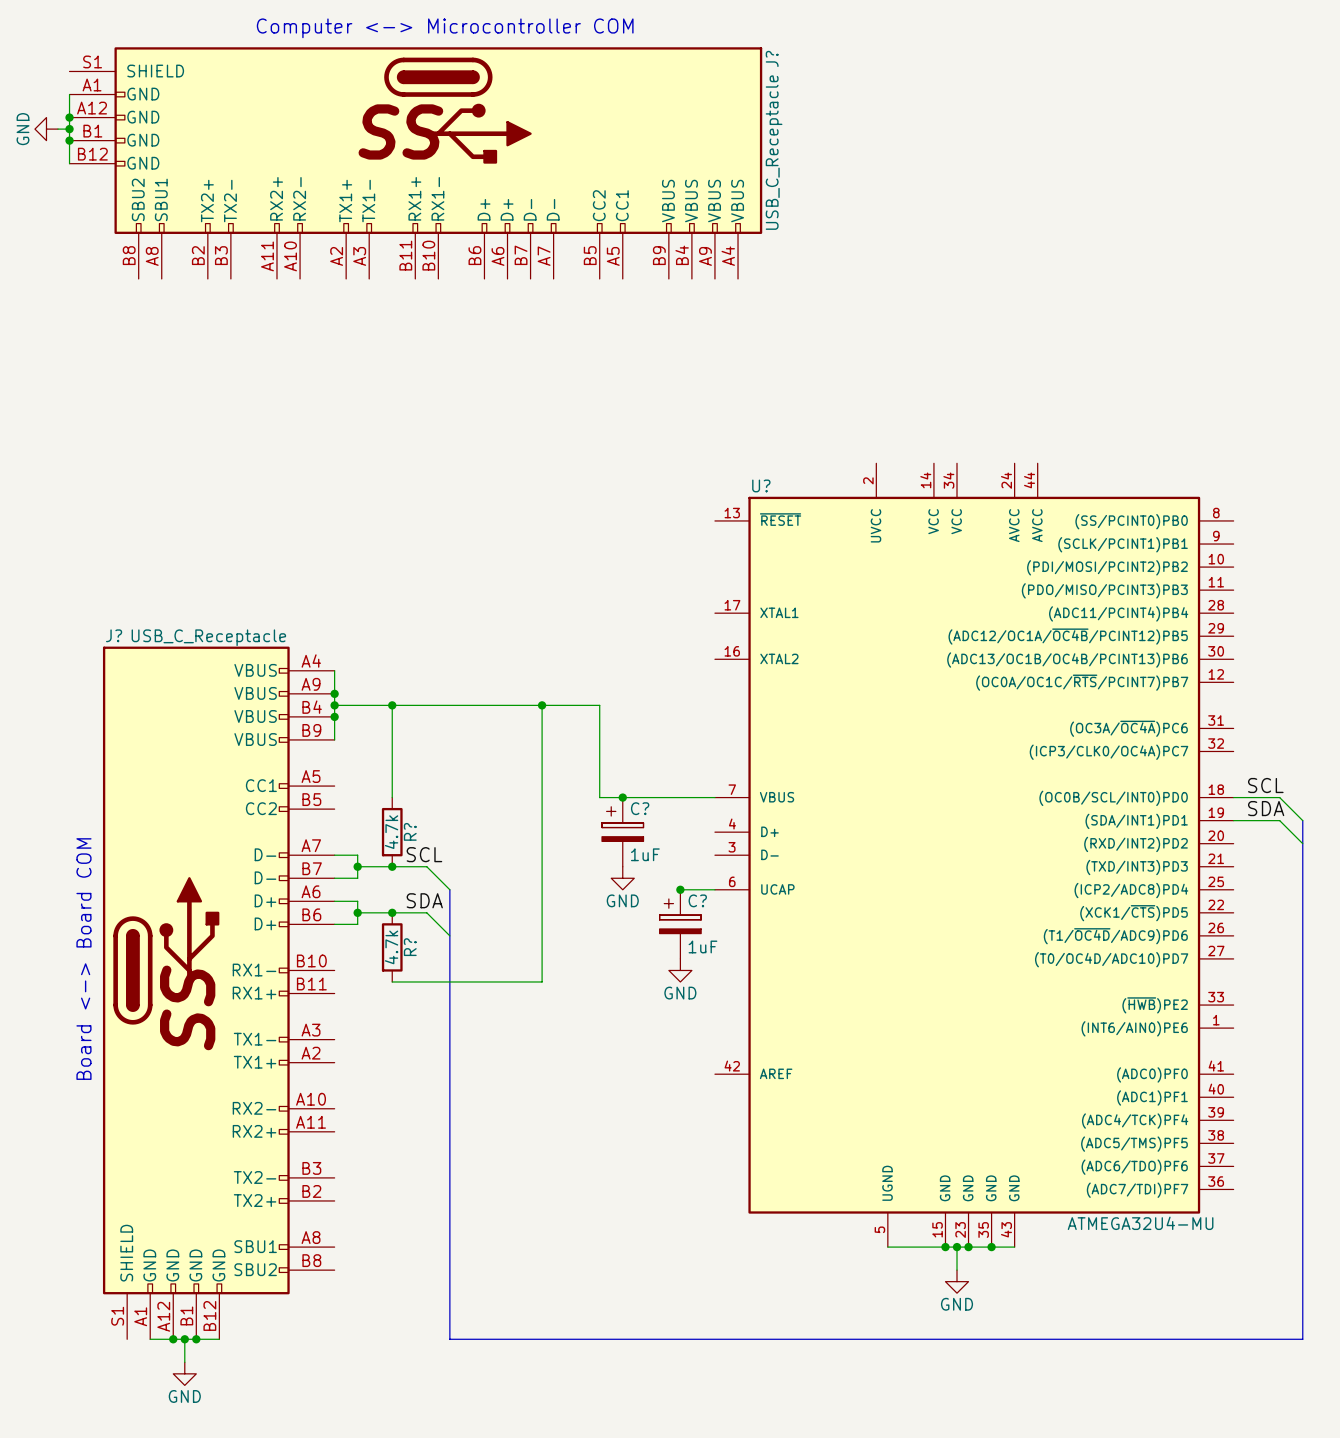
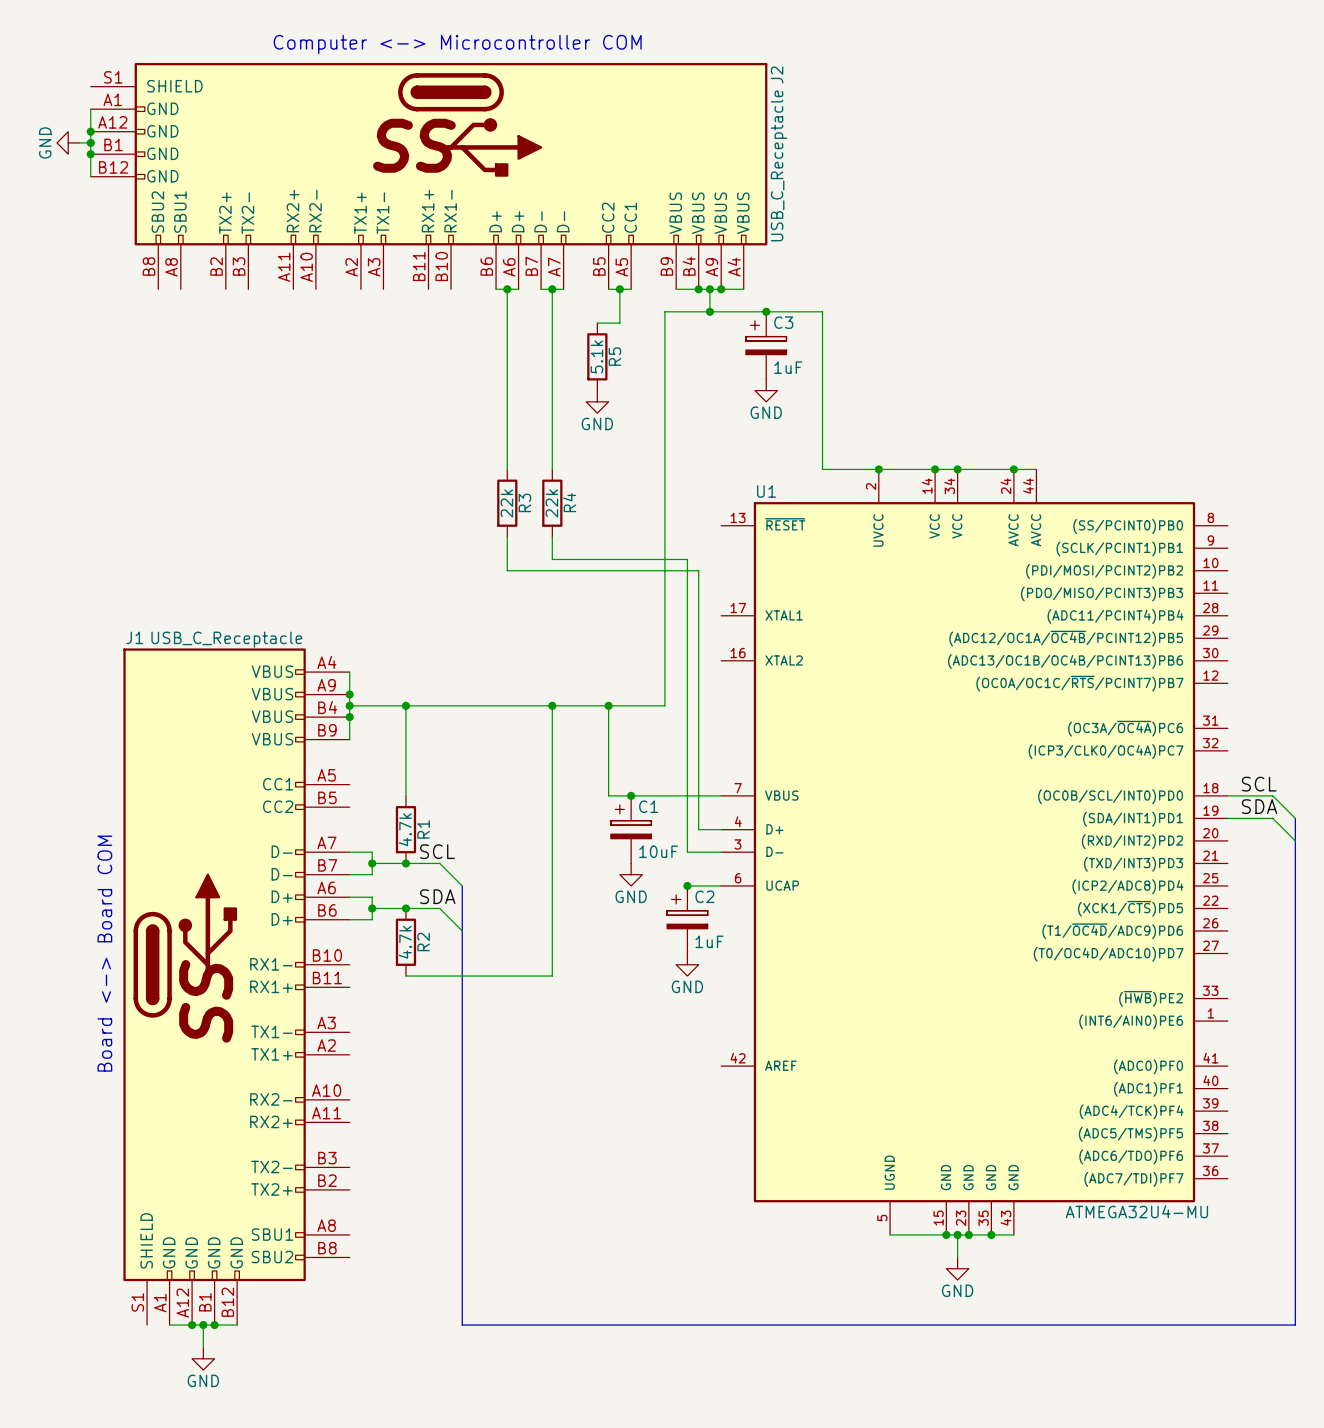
J? name: J? (772, 58) -> J2 (777, 74)
wire: none -> (496, 289) (518, 289)
wire: none -> (507, 289) (507, 469)
junction: none -> (507, 289)
wire: none -> (541, 289) (563, 289)
wire: none -> (552, 289) (552, 469)
junction: none -> (552, 289)
wire: none -> (608, 289) (631, 289)
wire: none -> (619, 289) (619, 323) (597, 323)
junction: none -> (619, 289)
wire: none -> (676, 289) (743, 289)
junction: none -> (698, 289)
wire: none -> (709, 289) (709, 311)
junction: none -> (709, 289)
junction: none -> (721, 289)
junction: none -> (709, 311)
junction: none -> (766, 311)
C3: none -> 1uF (766, 345)
R5: none -> 5.1k (597, 356)
power symbol: none -> GND (766, 390)
power symbol: none -> GND (597, 401)
junction: none -> (878, 469)
junction: none -> (935, 469)
junction: none -> (957, 469)
junction: none -> (1013, 469)
wire: none -> (1036, 469) (822, 469) (822, 311) (664, 311) (664, 705) (608, 705)
U? name: U? (761, 485) -> U1 (766, 491)
R3: none -> 22k (507, 503)
R4: none -> 22k (552, 503)
wire: none -> (507, 536) (507, 570) (698, 570) (698, 829) (721, 829)
wire: none -> (552, 536) (552, 559) (687, 559) (687, 852) (721, 852)
J? name: J? (114, 635) -> J1 (134, 637)
junction: none -> (608, 705)
C? name: C? (640, 808) -> C1 (648, 806)
R? name: R? (410, 831) -> R1 (423, 829)
C? value: 1uF (645, 854) -> 10uF (658, 851)
C? name: C? (697, 900) -> C2 (704, 896)
R? name: R? (410, 947) -> R2 (423, 941)

